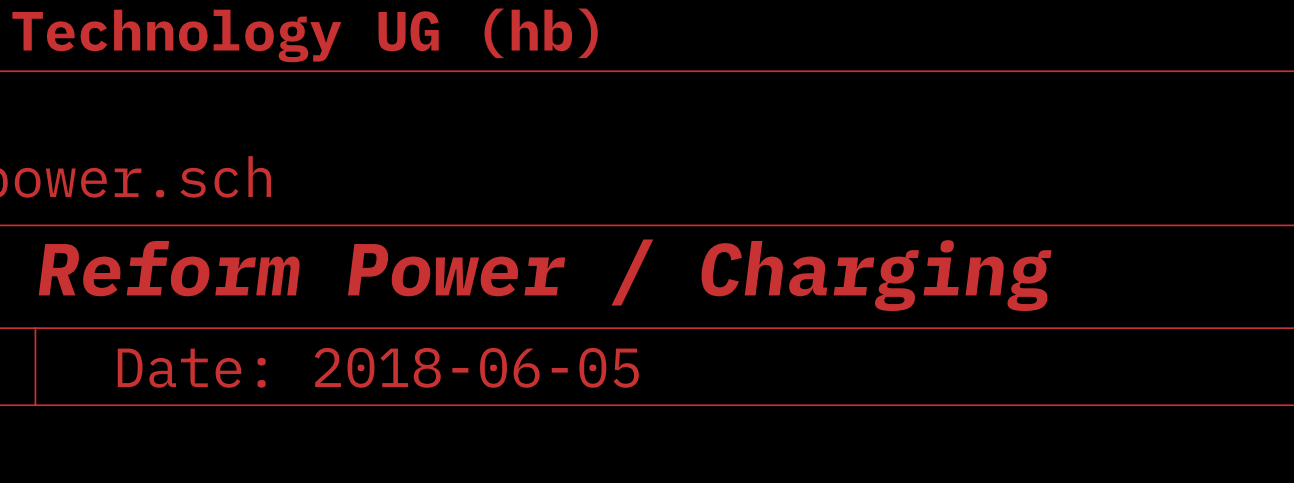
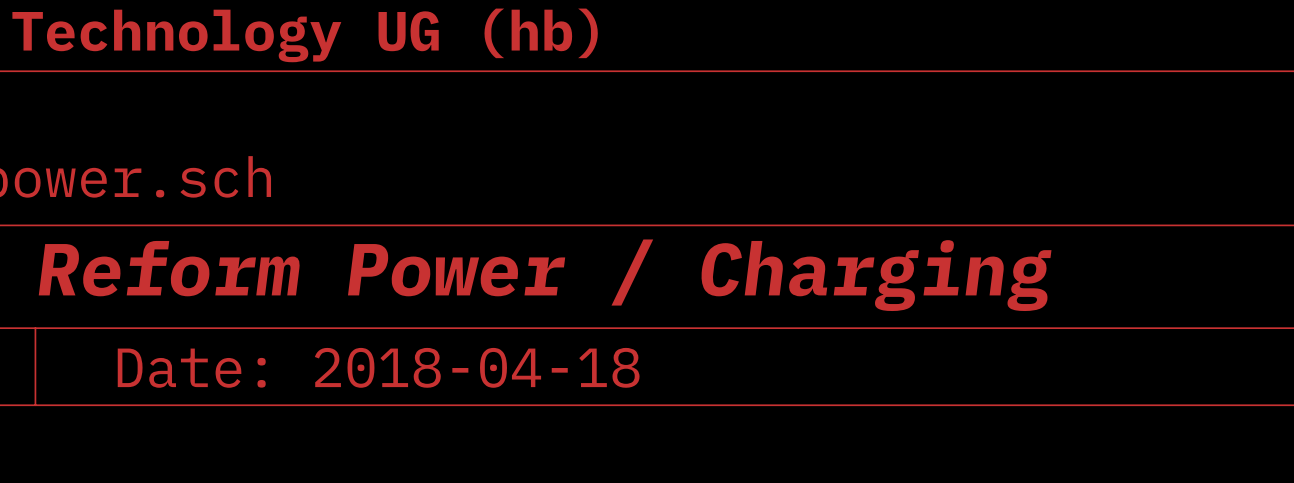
title block: Date: 2018-06-05 (378, 367) -> Date: 2018-04-18 (378, 367)

